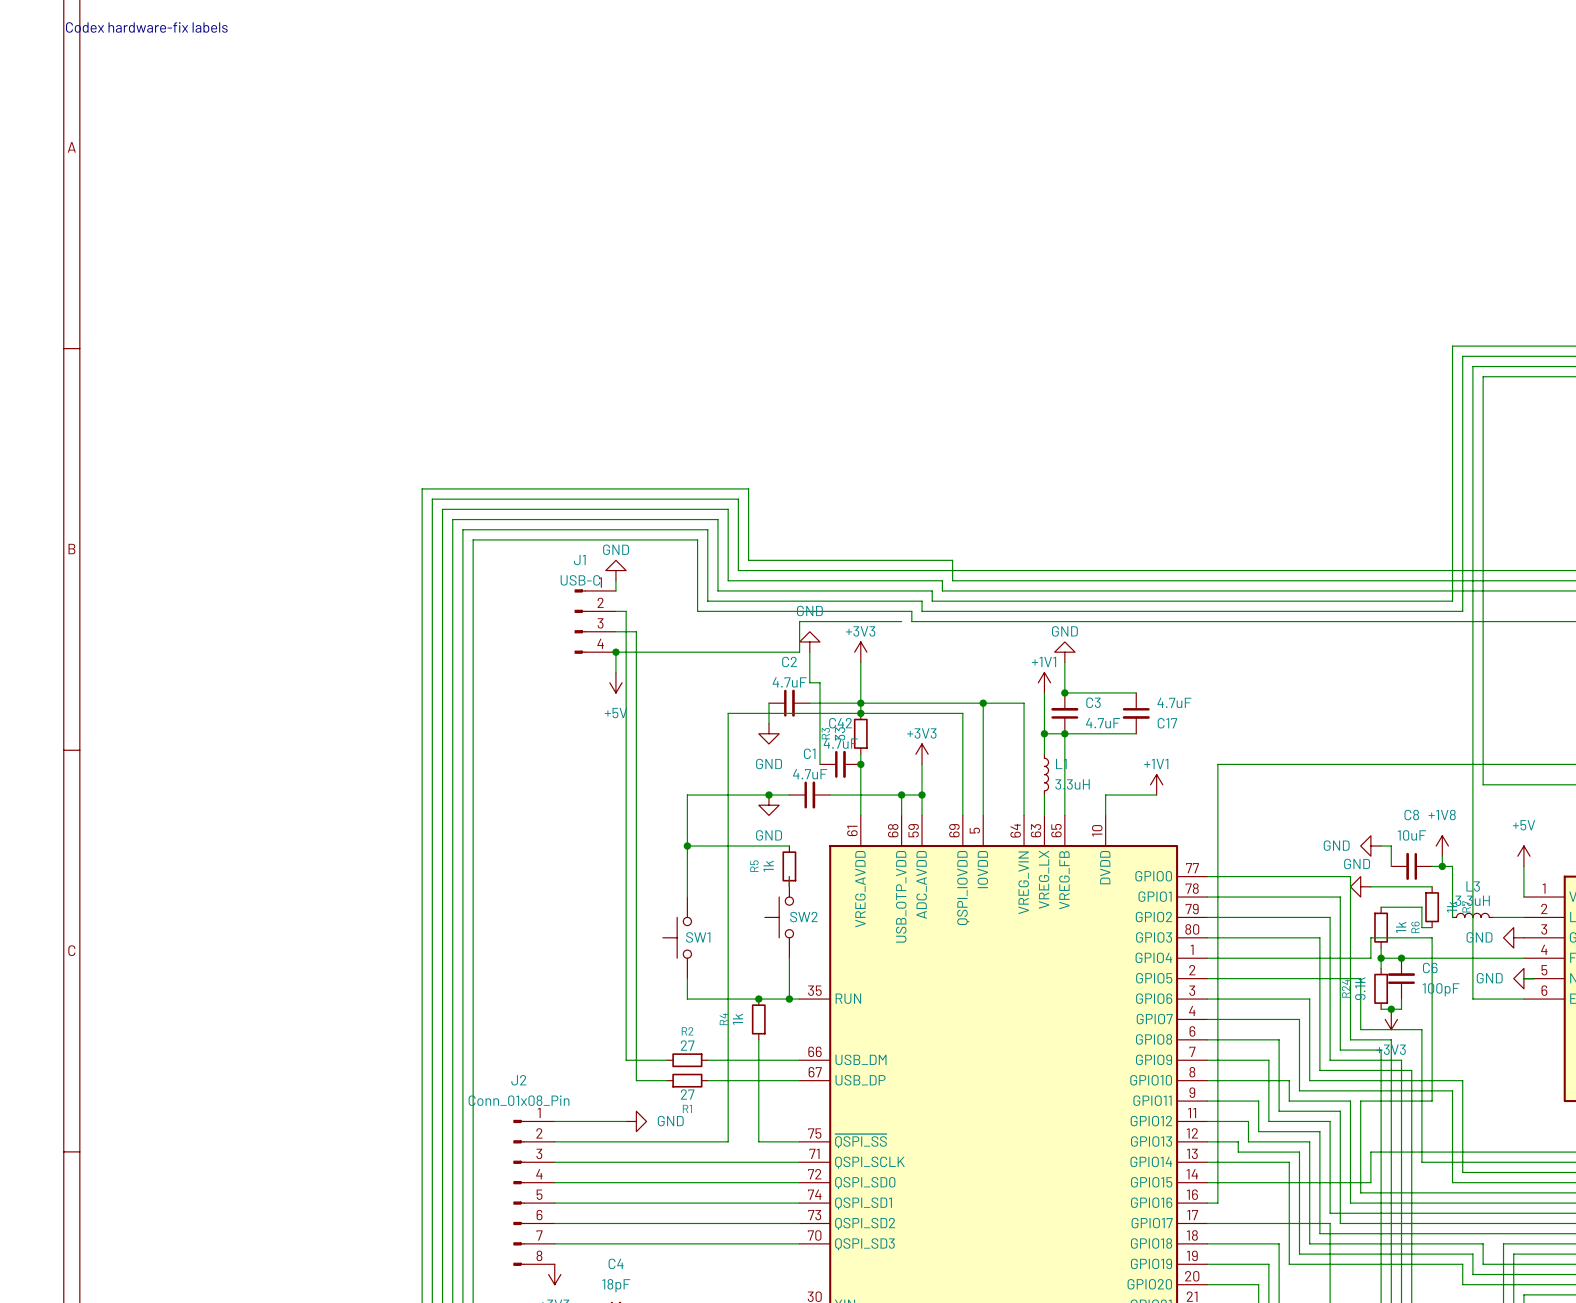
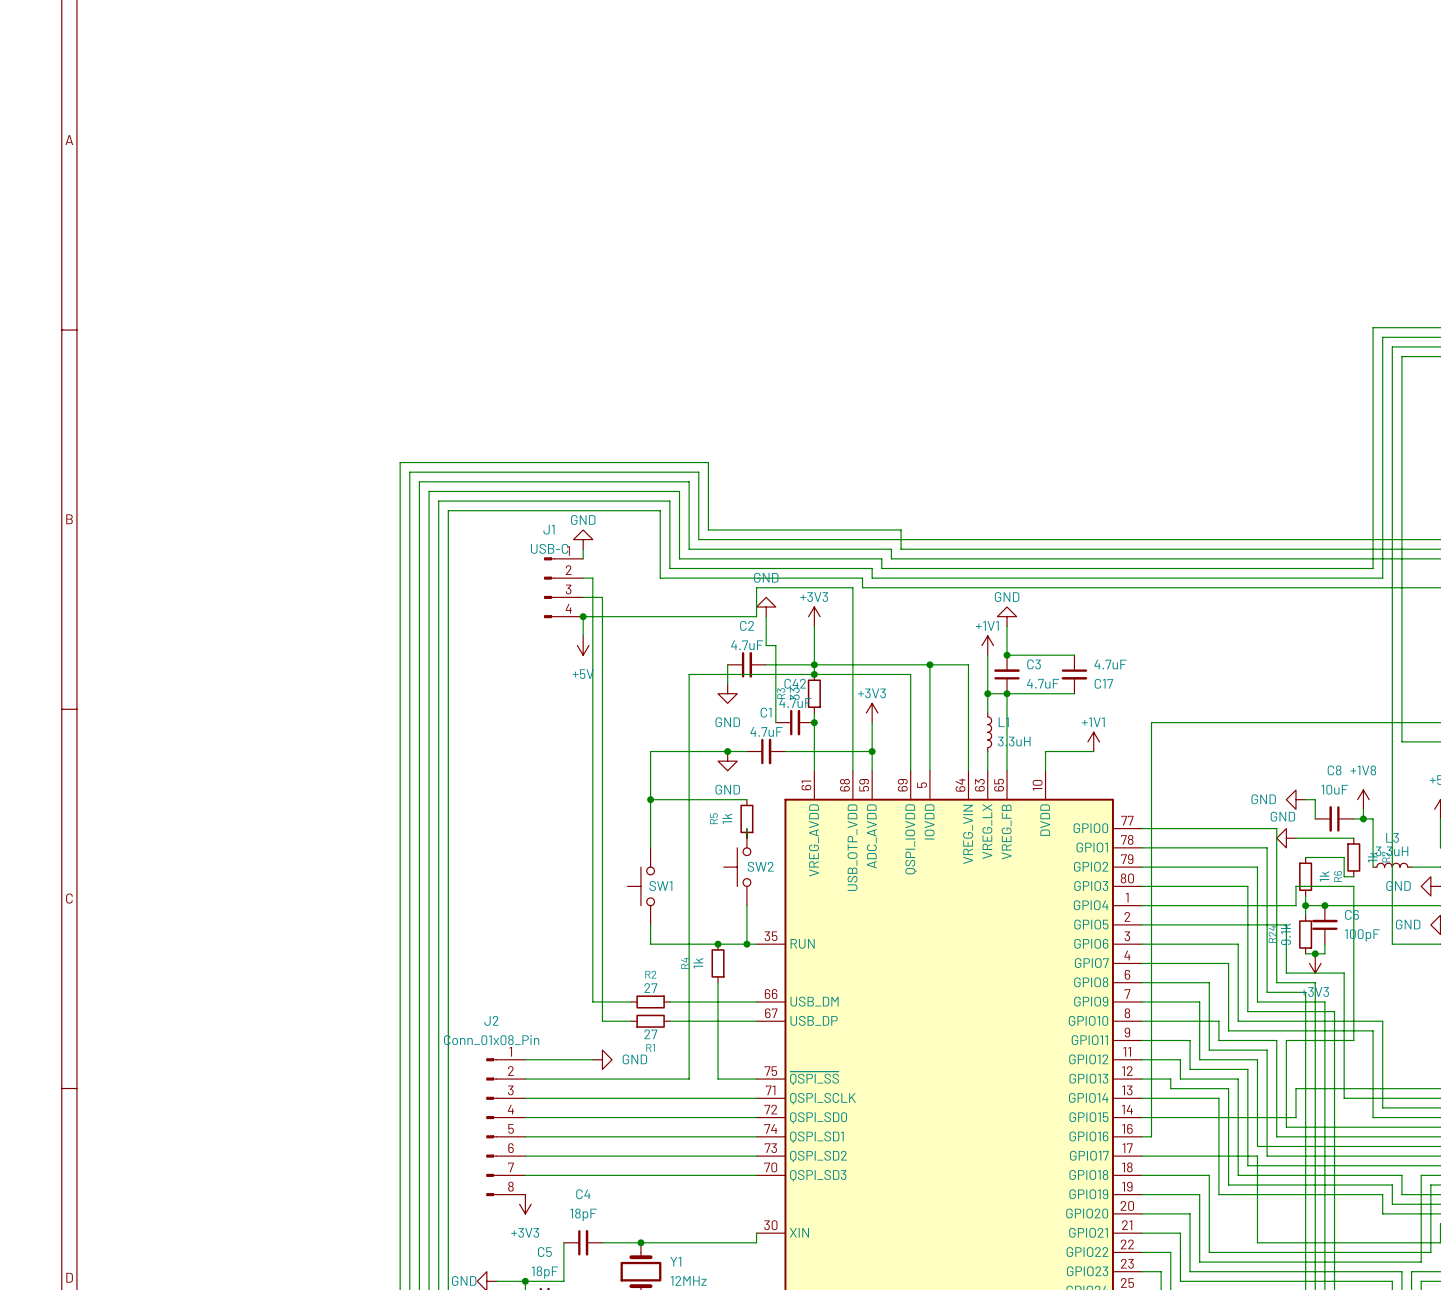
text: Codex hardware-fix labels (146, 27) -> none
wire: none -> (852, 587) (852, 751)
junction: (901, 795) -> none

